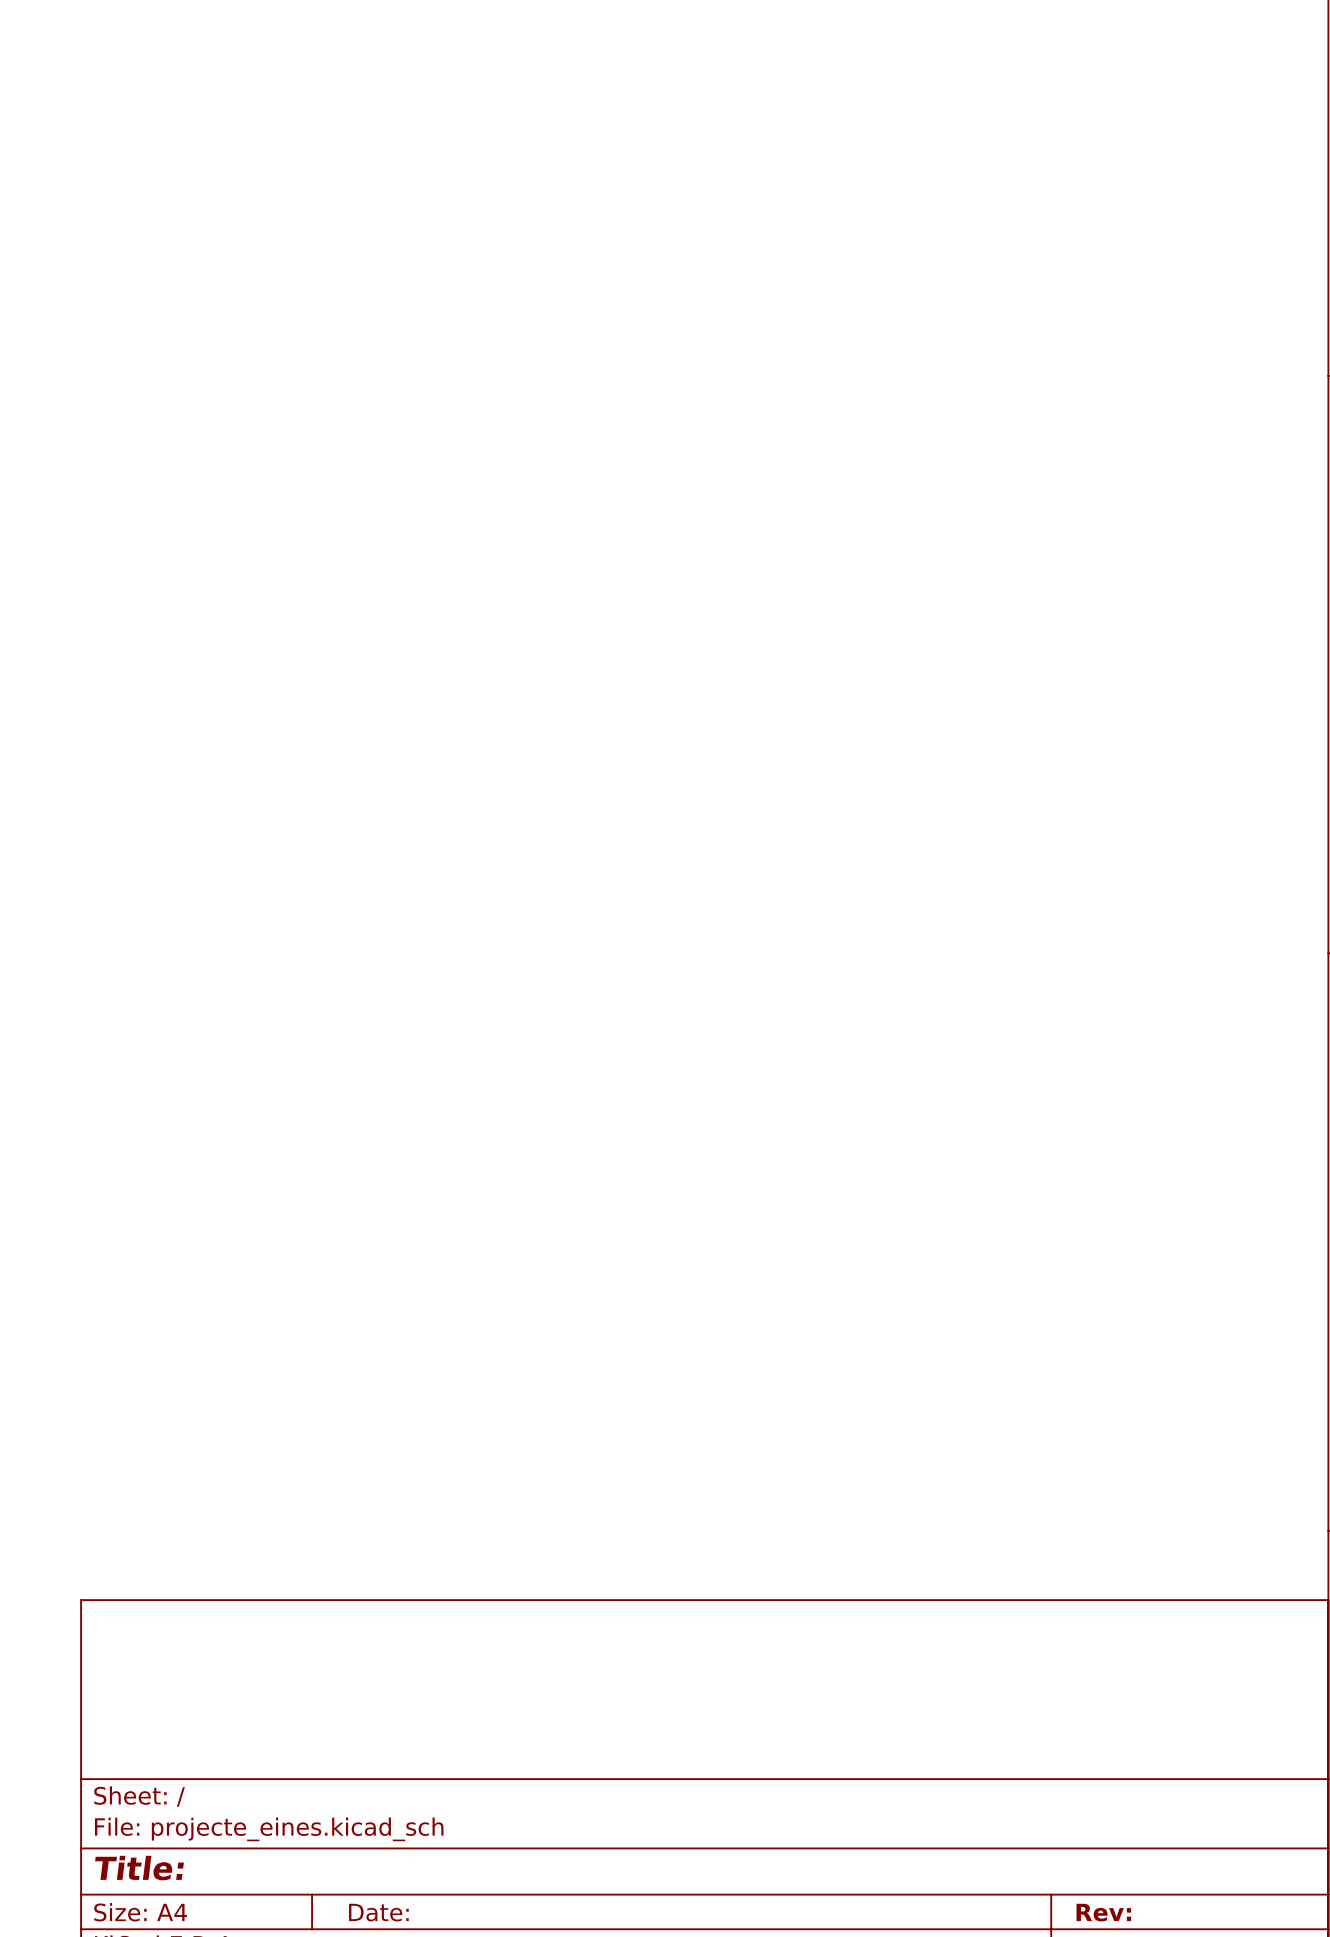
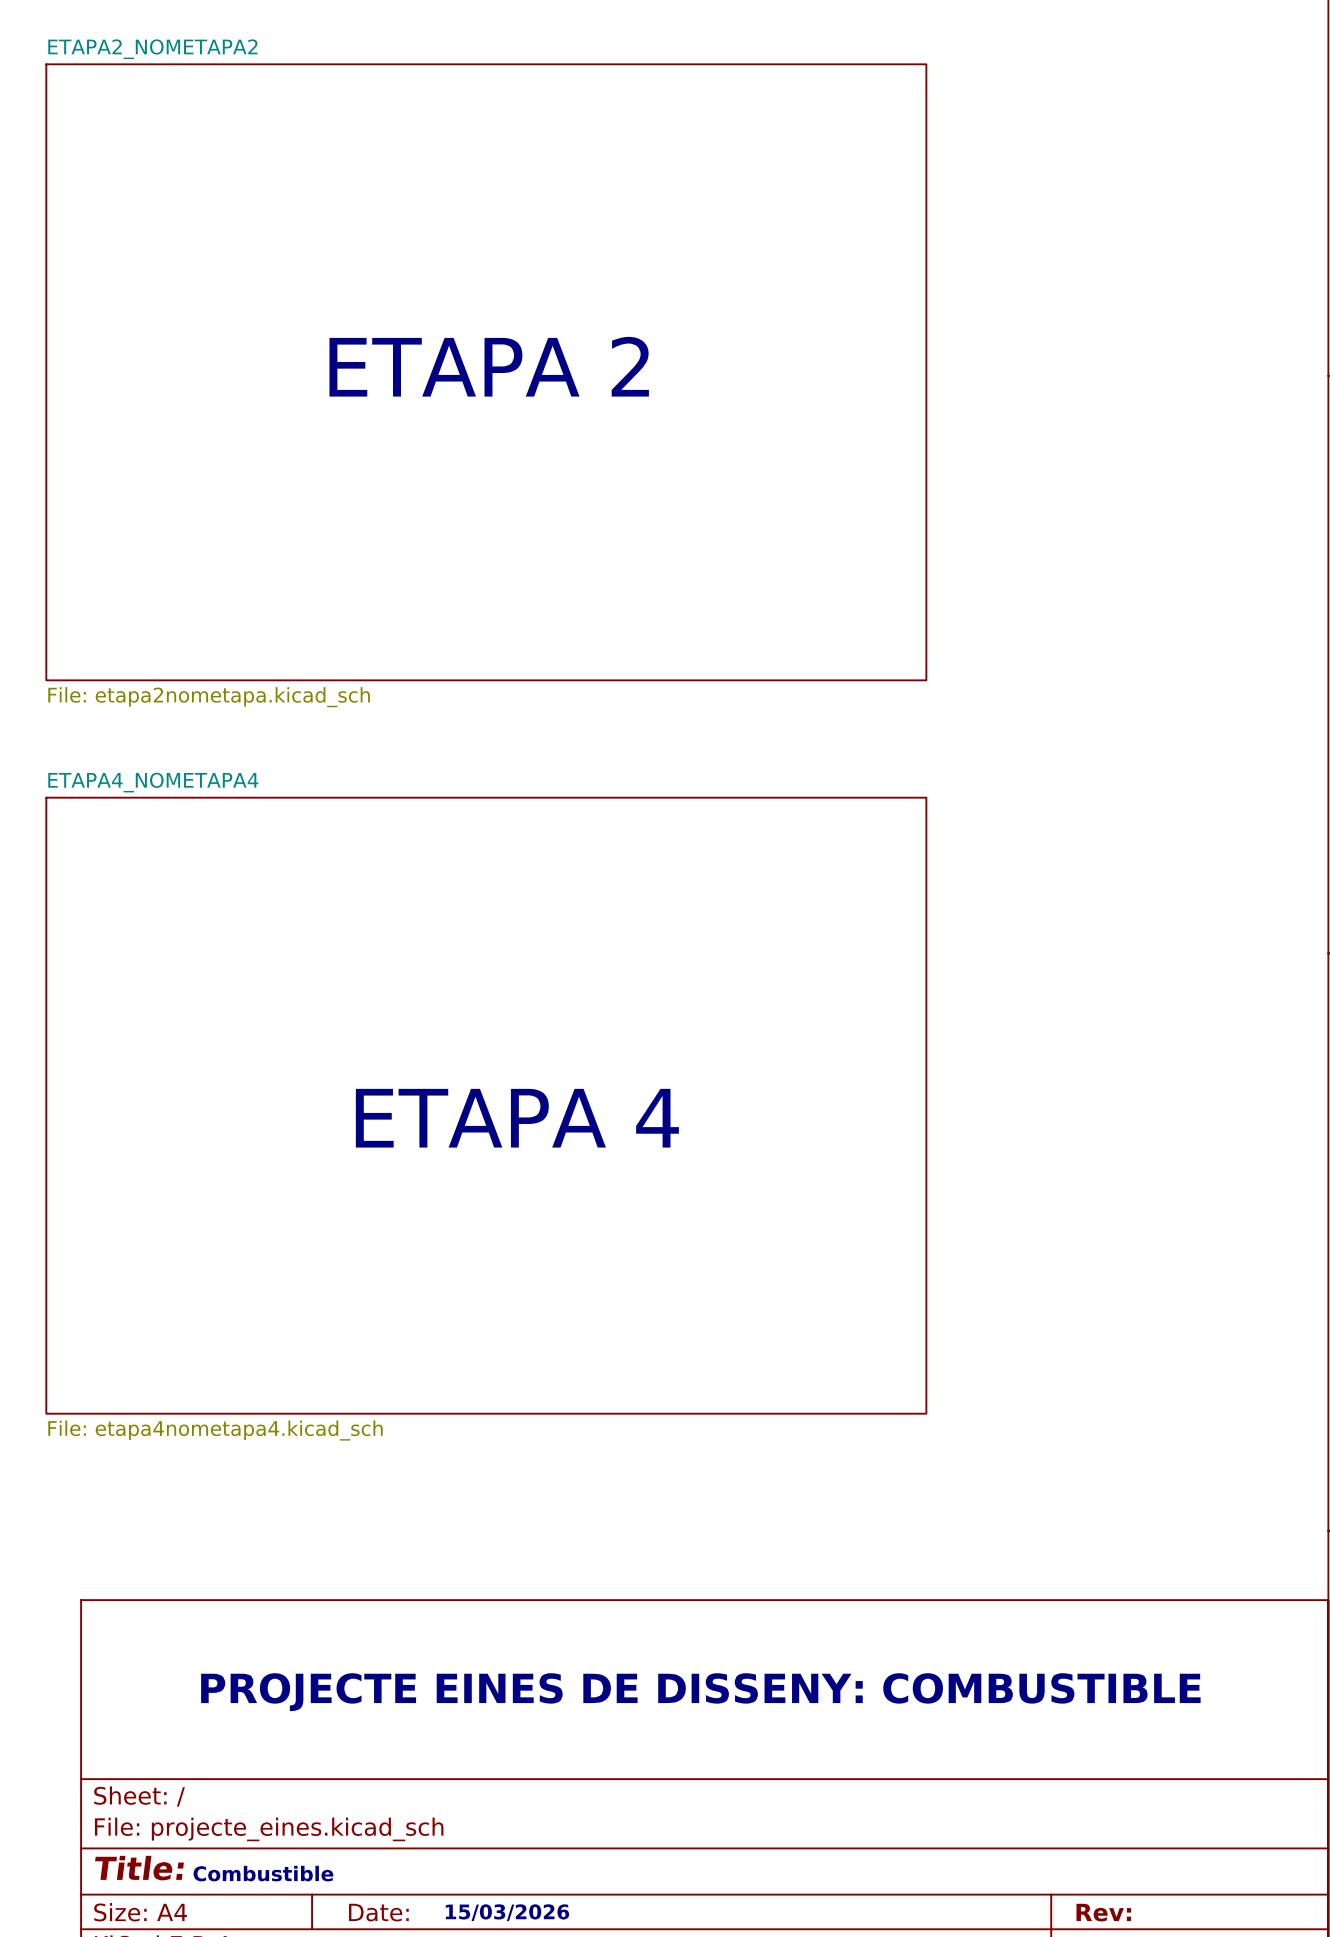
text: none -> ETAPA 2 (489, 366)
sheet ETAPA2_NOMETAPA2: none -> File: etapa2nometapa.kicad_sch (486, 372)
sheet ETAPA4_NOMETAPA4: none -> File: etapa4nometapa4.kicad_sch (486, 1105)
text: none -> ETAPA 4 (517, 1118)
text: none -> PROJECTE EINES DE DISSENY: COMBUSTIBLE (700, 1692)
text: none -> Combustible (263, 1873)
text: none -> 15/03/2026 (507, 1912)

